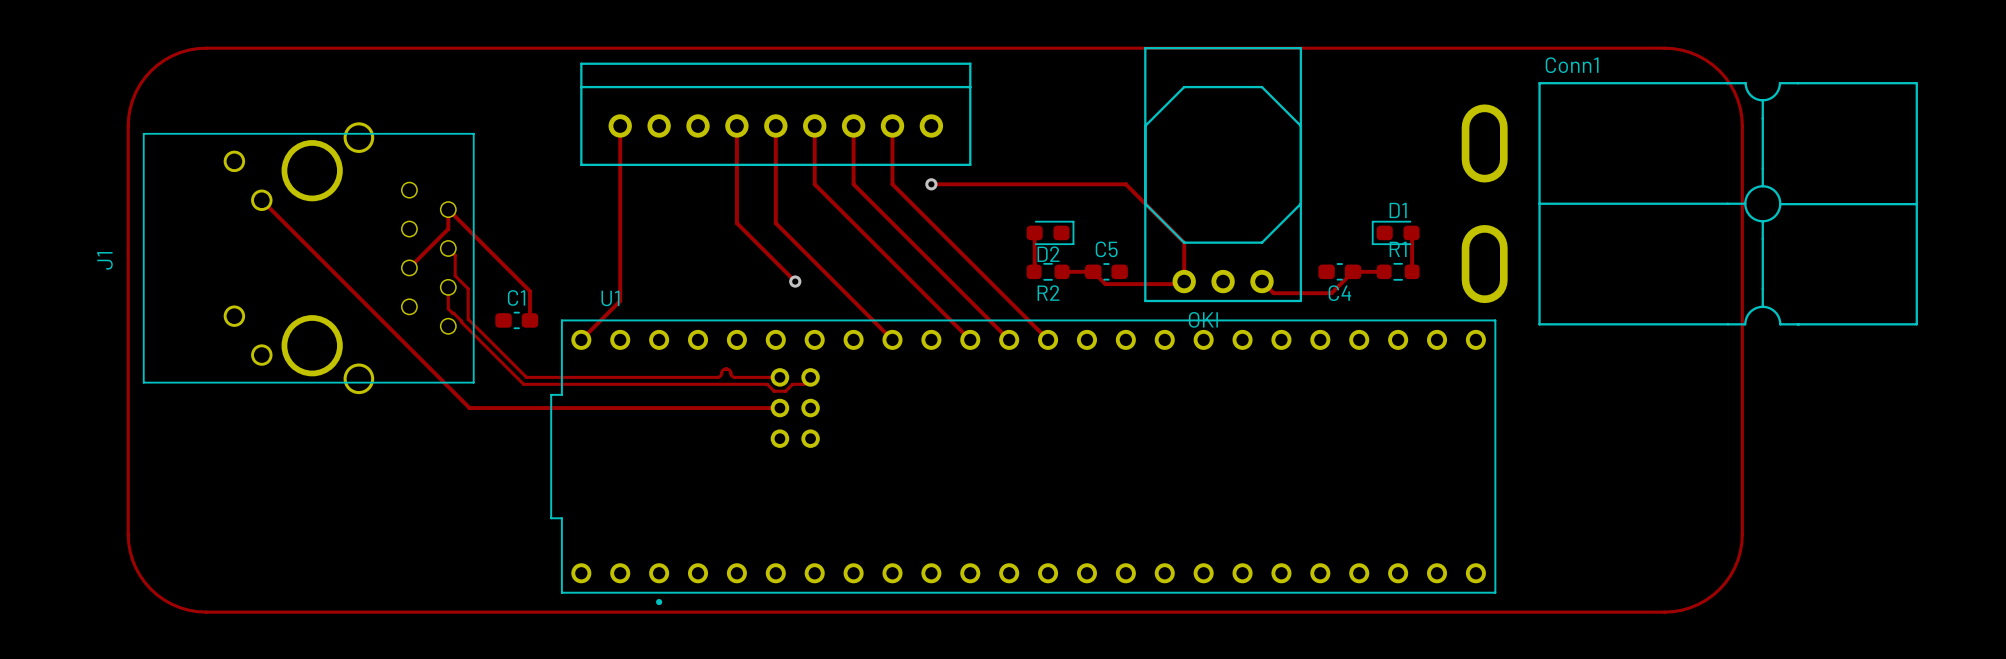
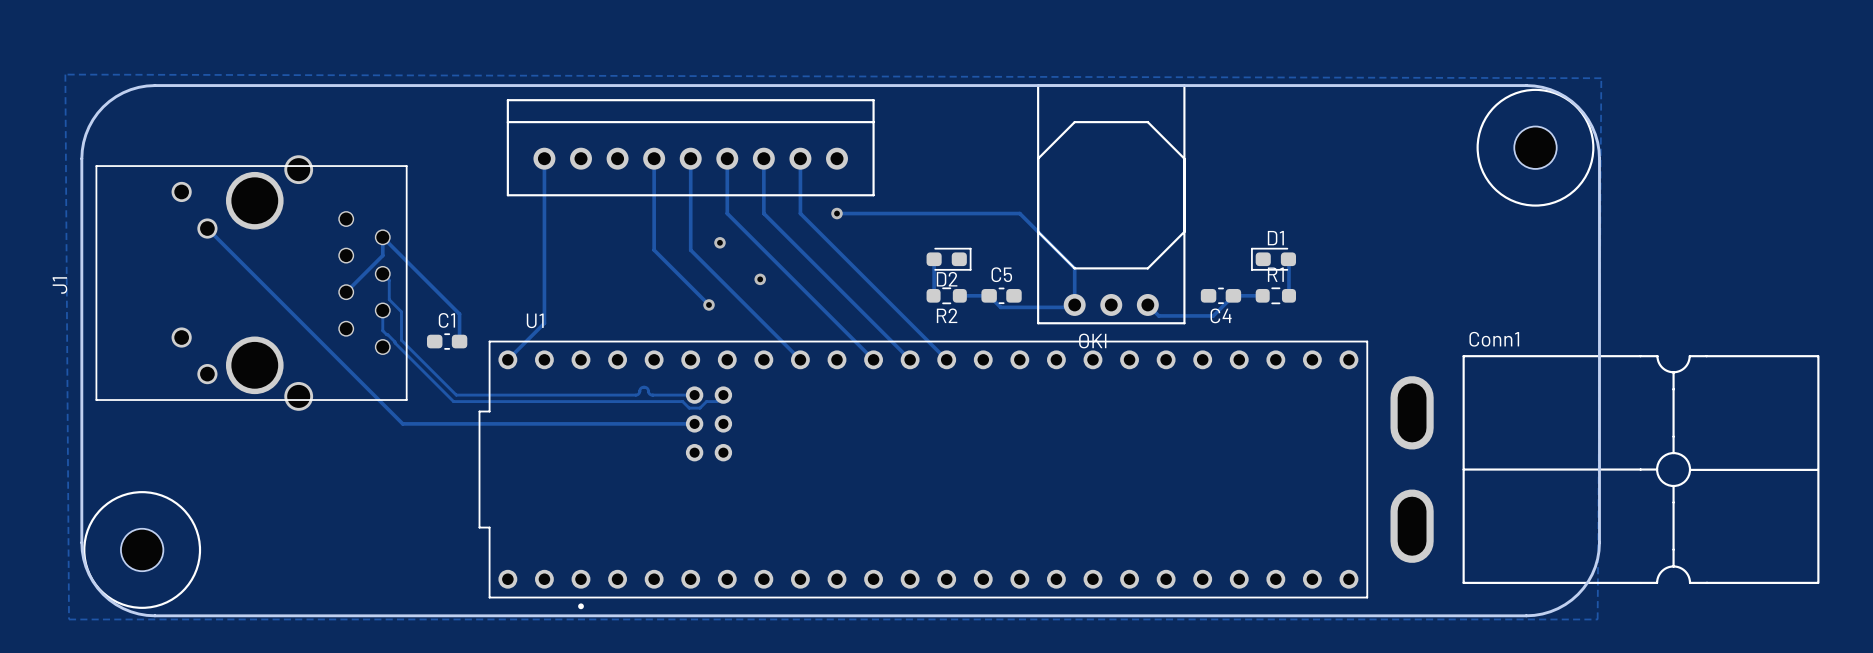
zone outline: none -> (65, 74) (69, 619) (1597, 619) (1601, 78) (65, 74)
track: (206, 48) (1664, 48) (1690, 52) (1713, 65) (1725, 77) (1734, 92) (1741, 117) (1742, 534) (1737, 560) (1725, 582) (1713, 595) (1690, 607) (1664, 612) (206, 612) (180, 607) (157, 595) (145, 582) (132, 560) (128, 543) (128, 125) (132, 100) (140, 84) (151, 70) (172, 55) (188, 50) (206, 48) -> none
board edge: none -> (154, 85) (1526, 85) (1550, 89) (1571, 101) (1583, 113) (1592, 126) (1599, 150) (1599, 542) (1595, 566) (1583, 588) (1571, 599) (1550, 611) (1526, 615) (154, 615) (130, 611) (109, 599) (97, 588) (85, 566) (82, 550) (81, 158) (85, 134) (93, 119) (103, 106) (123, 92) (138, 87) (154, 85)
part: none -> (1535, 147)
Conn1 position: (1689, 203) -> (1604, 469)
via: none -> (719, 242)
via: none -> (760, 279)
part: none -> (142, 549)

